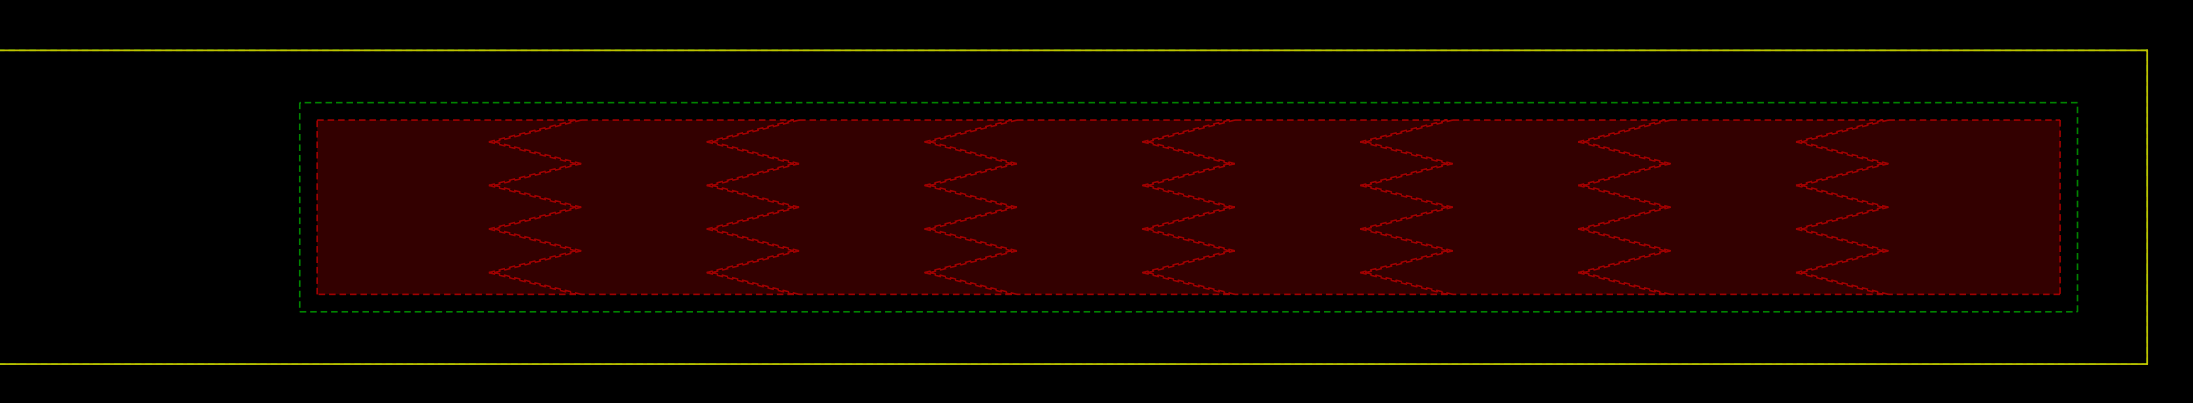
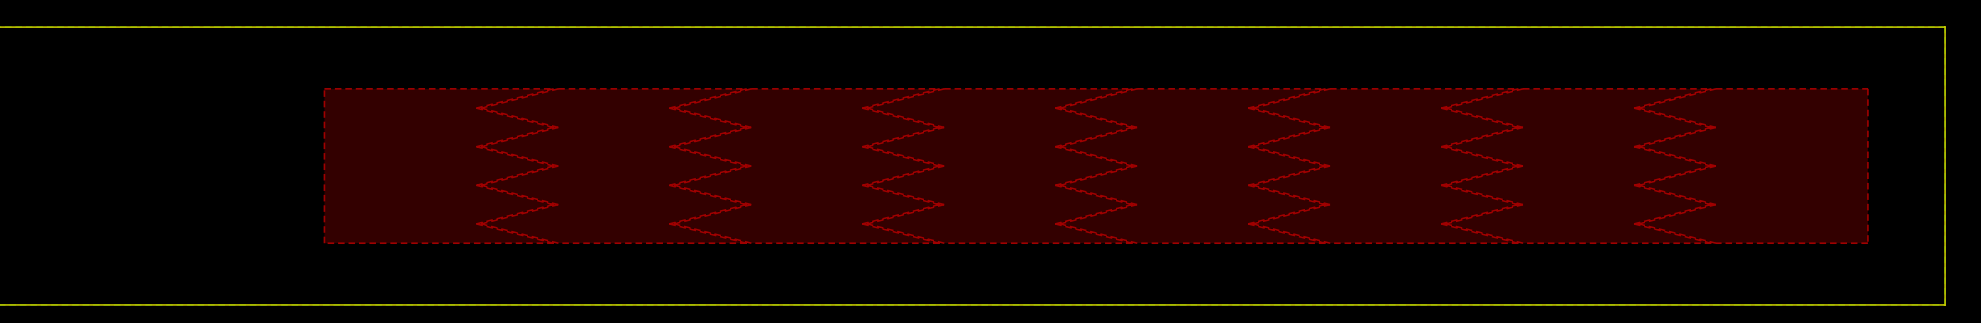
bottom zone outline: (2077, 102) (299, 102) (299, 311) (2077, 311) (2077, 102) -> none

